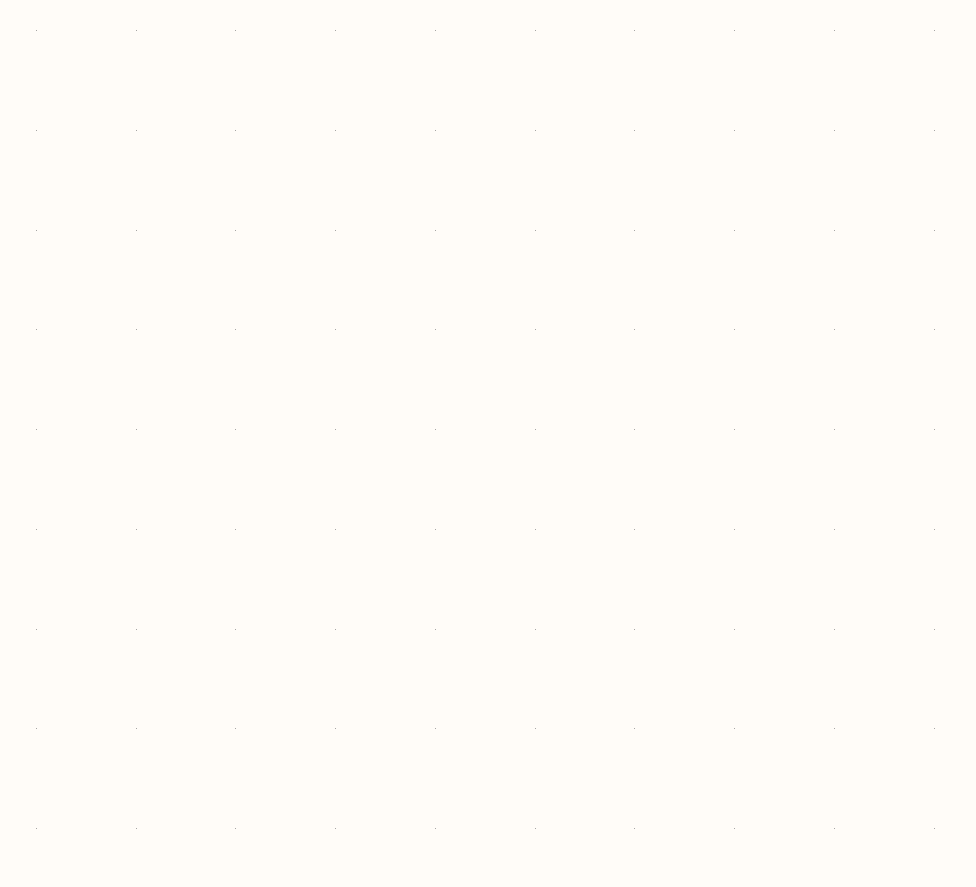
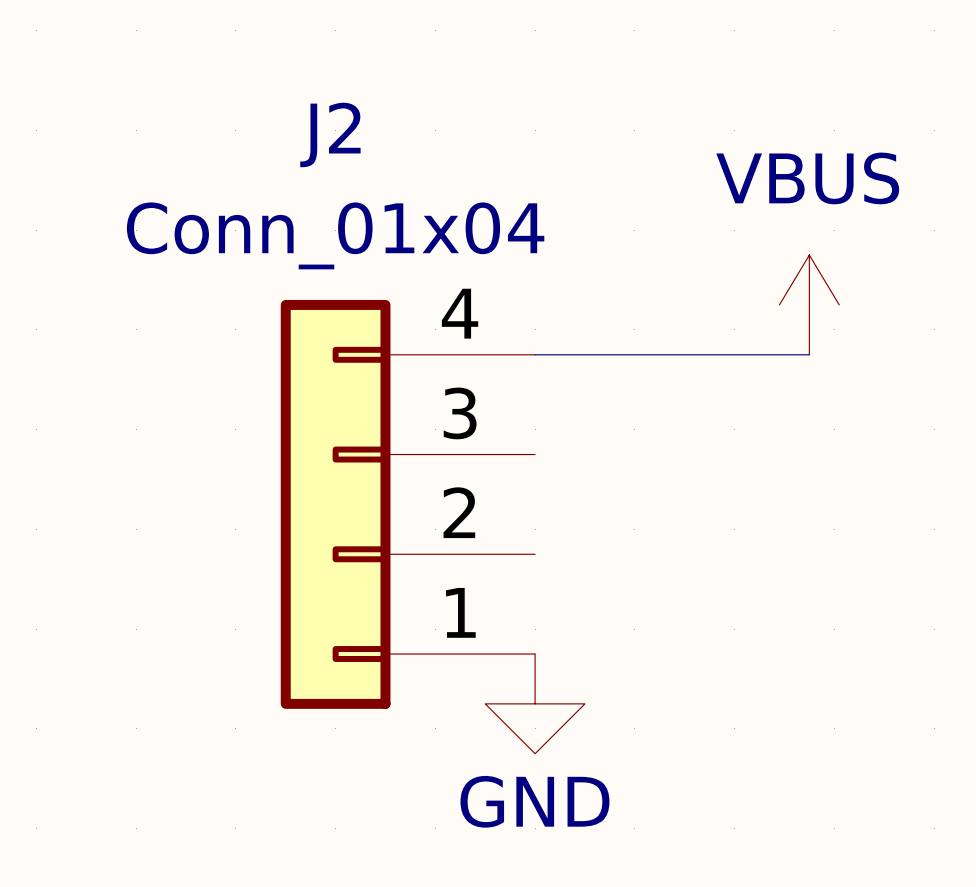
power symbol: none -> VBUS (809, 304)
wire: none -> (535, 354) (809, 354)
J2: none -> Conn_01x04 (407, 504)
power symbol: none -> GND (535, 703)

